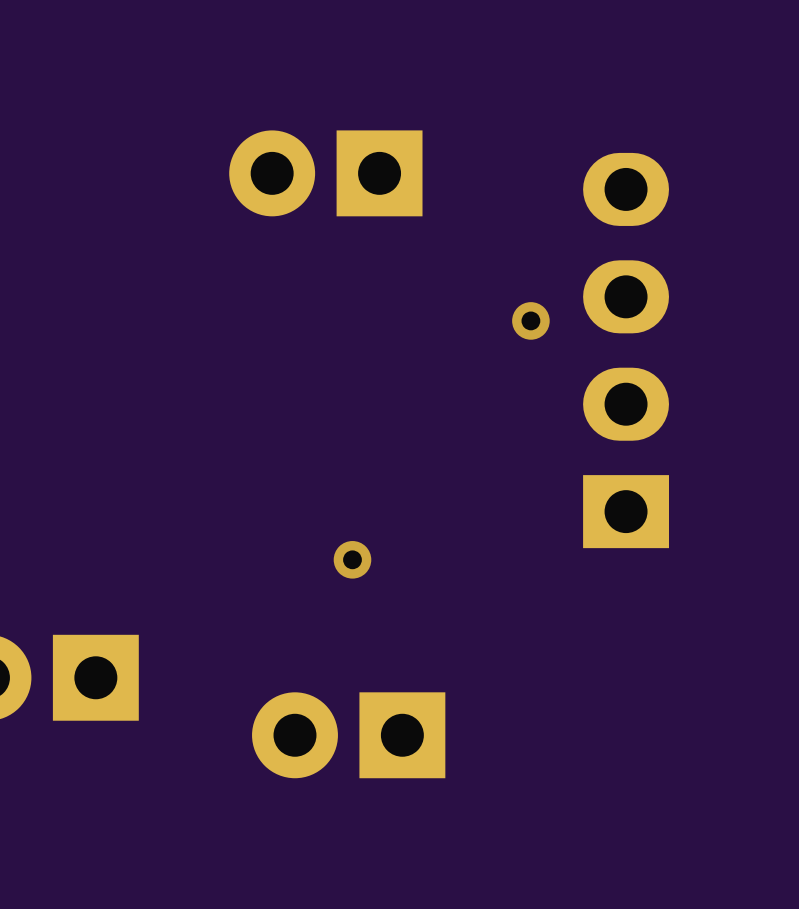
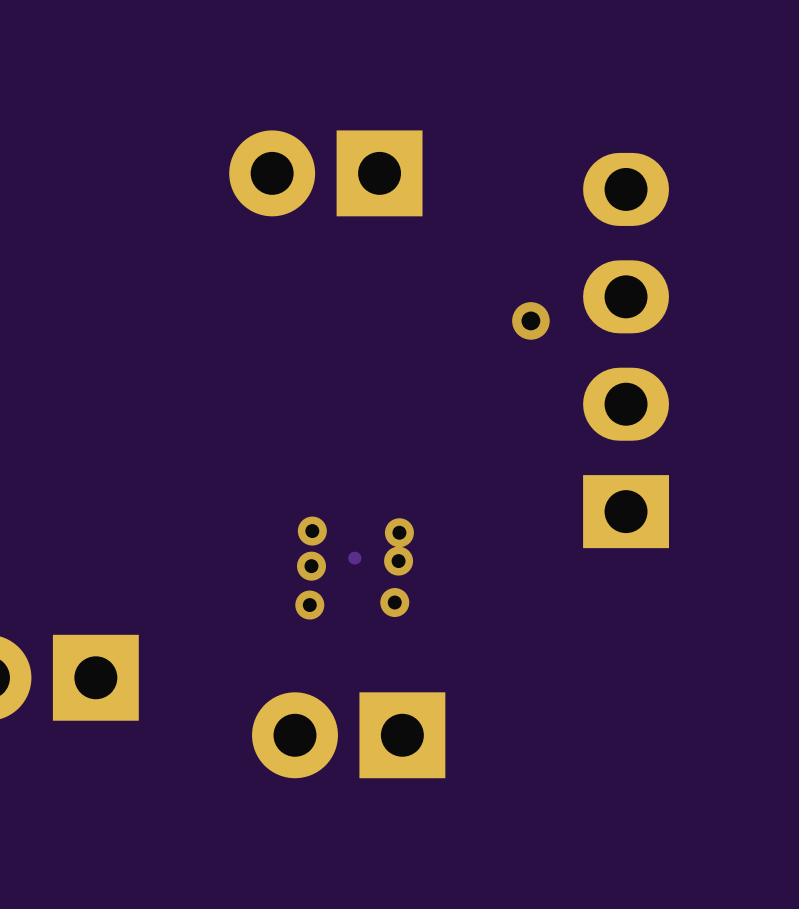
via: none -> (312, 531)
via: none -> (399, 532)
via: (352, 559) -> none
via: none -> (398, 561)
via: none -> (311, 566)
via: none -> (394, 602)
via: none -> (309, 605)

